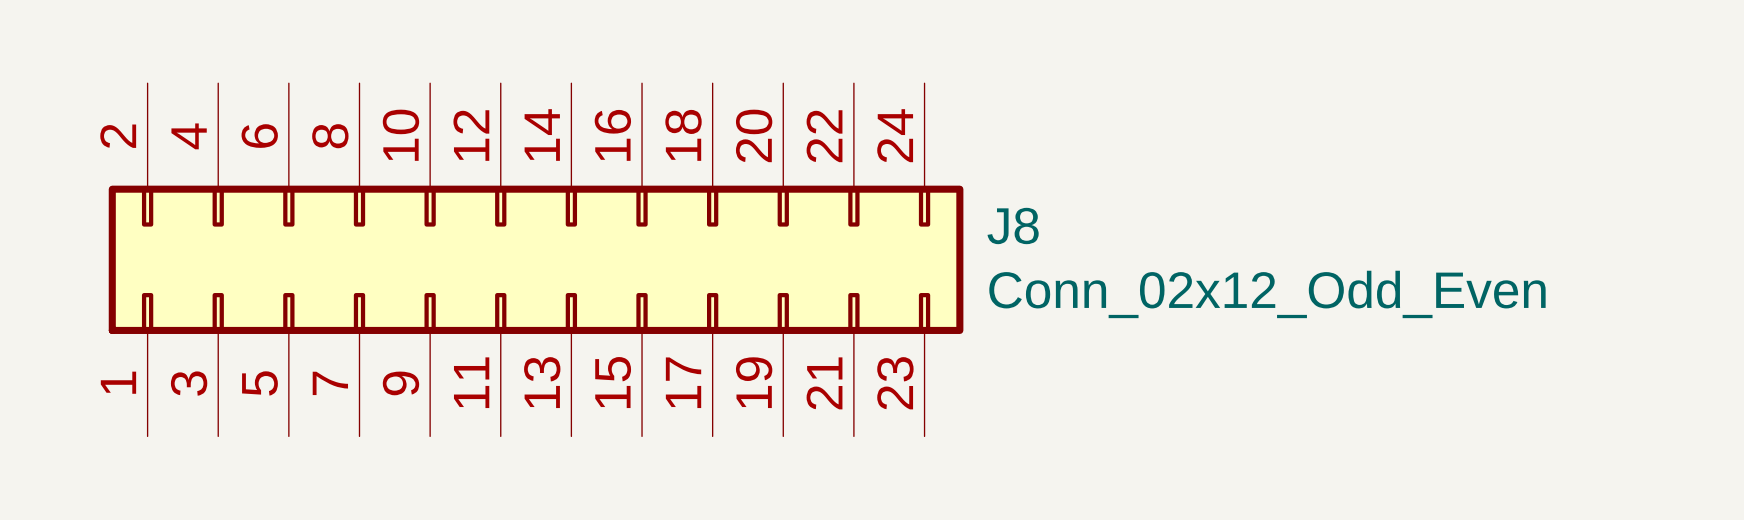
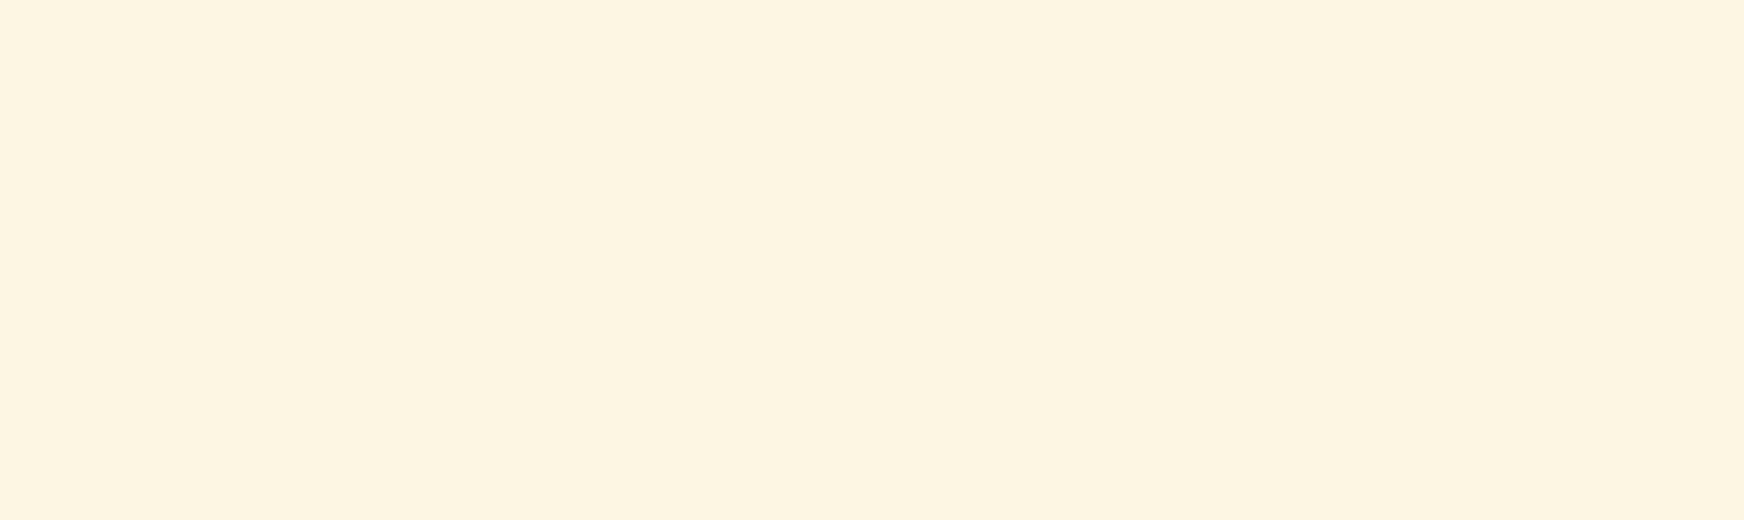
J8: Conn_02x12_Odd_Even (536, 259) -> none

